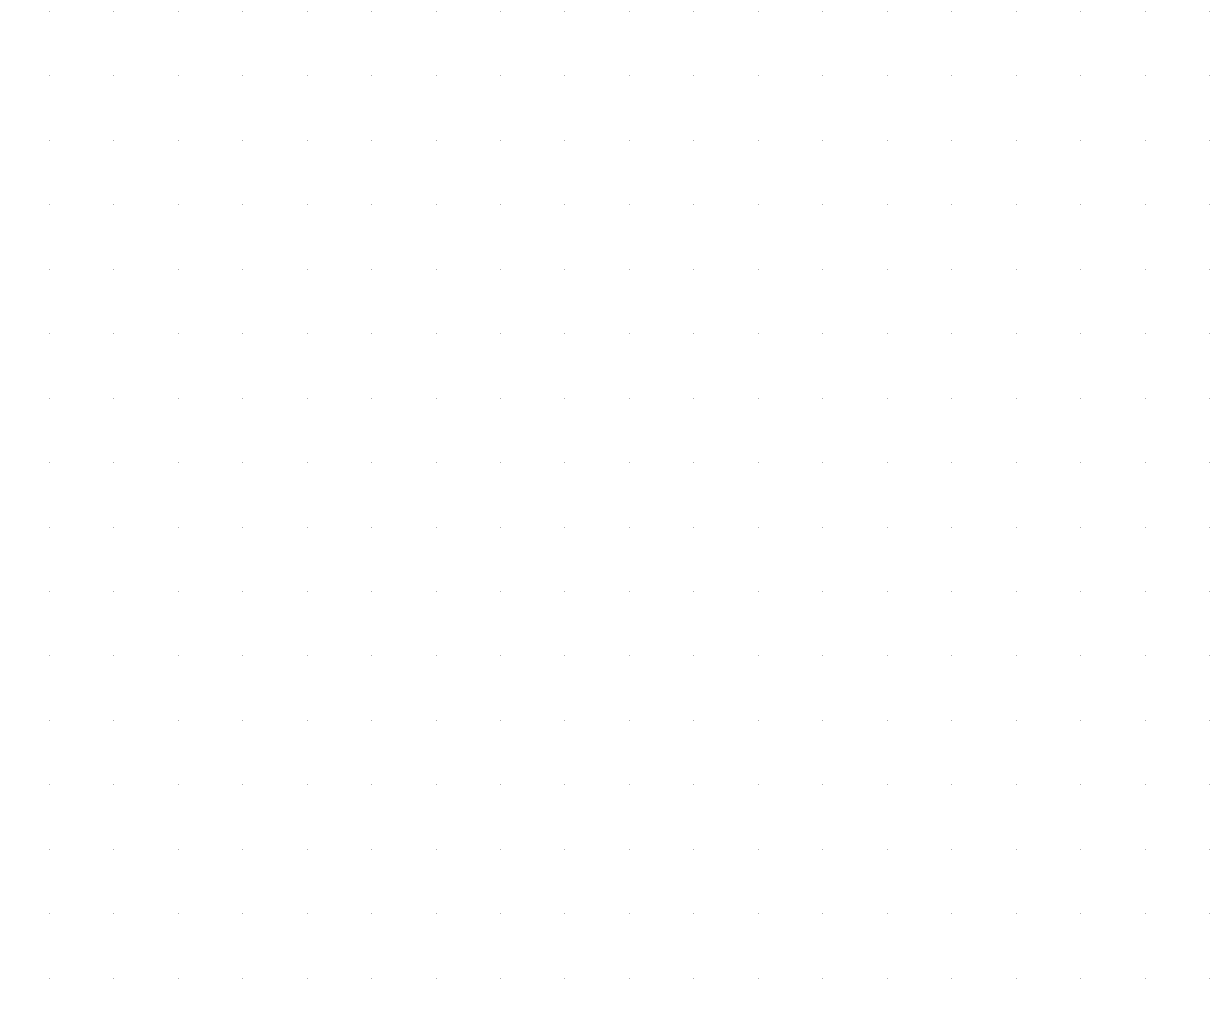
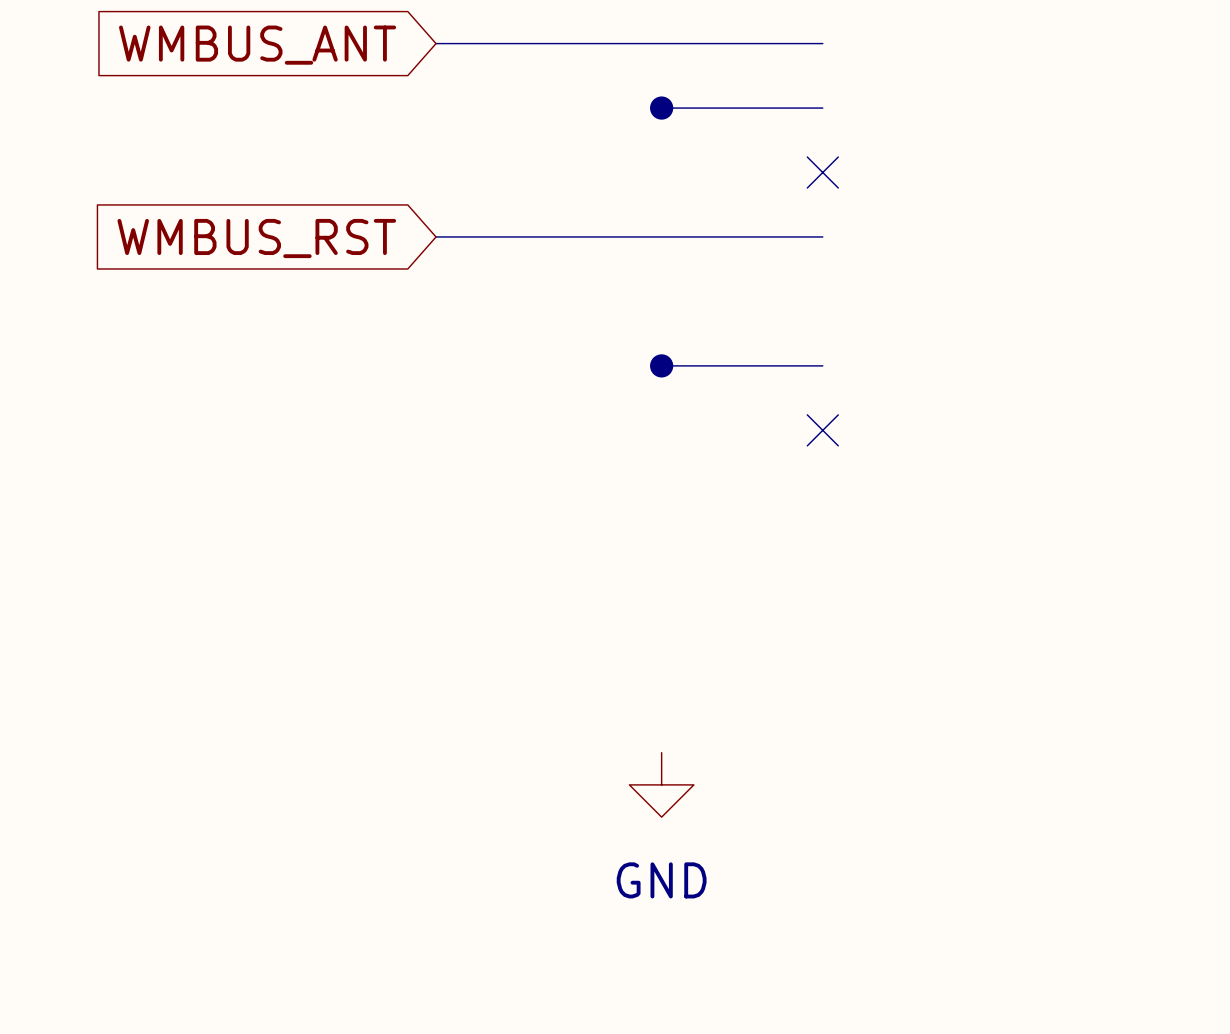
wire: none -> (436, 43) (822, 43)
global label: none -> WMBUS_ANT (257, 45)
wire: none -> (661, 108) (822, 108)
junction: none -> (661, 108)
no-connect mark: none -> (822, 172)
wire: none -> (436, 236) (822, 236)
global label: none -> WMBUS_RST (256, 238)
wire: none -> (661, 365) (822, 365)
junction: none -> (661, 365)
no-connect mark: none -> (822, 430)
power symbol: none -> GND (661, 784)

